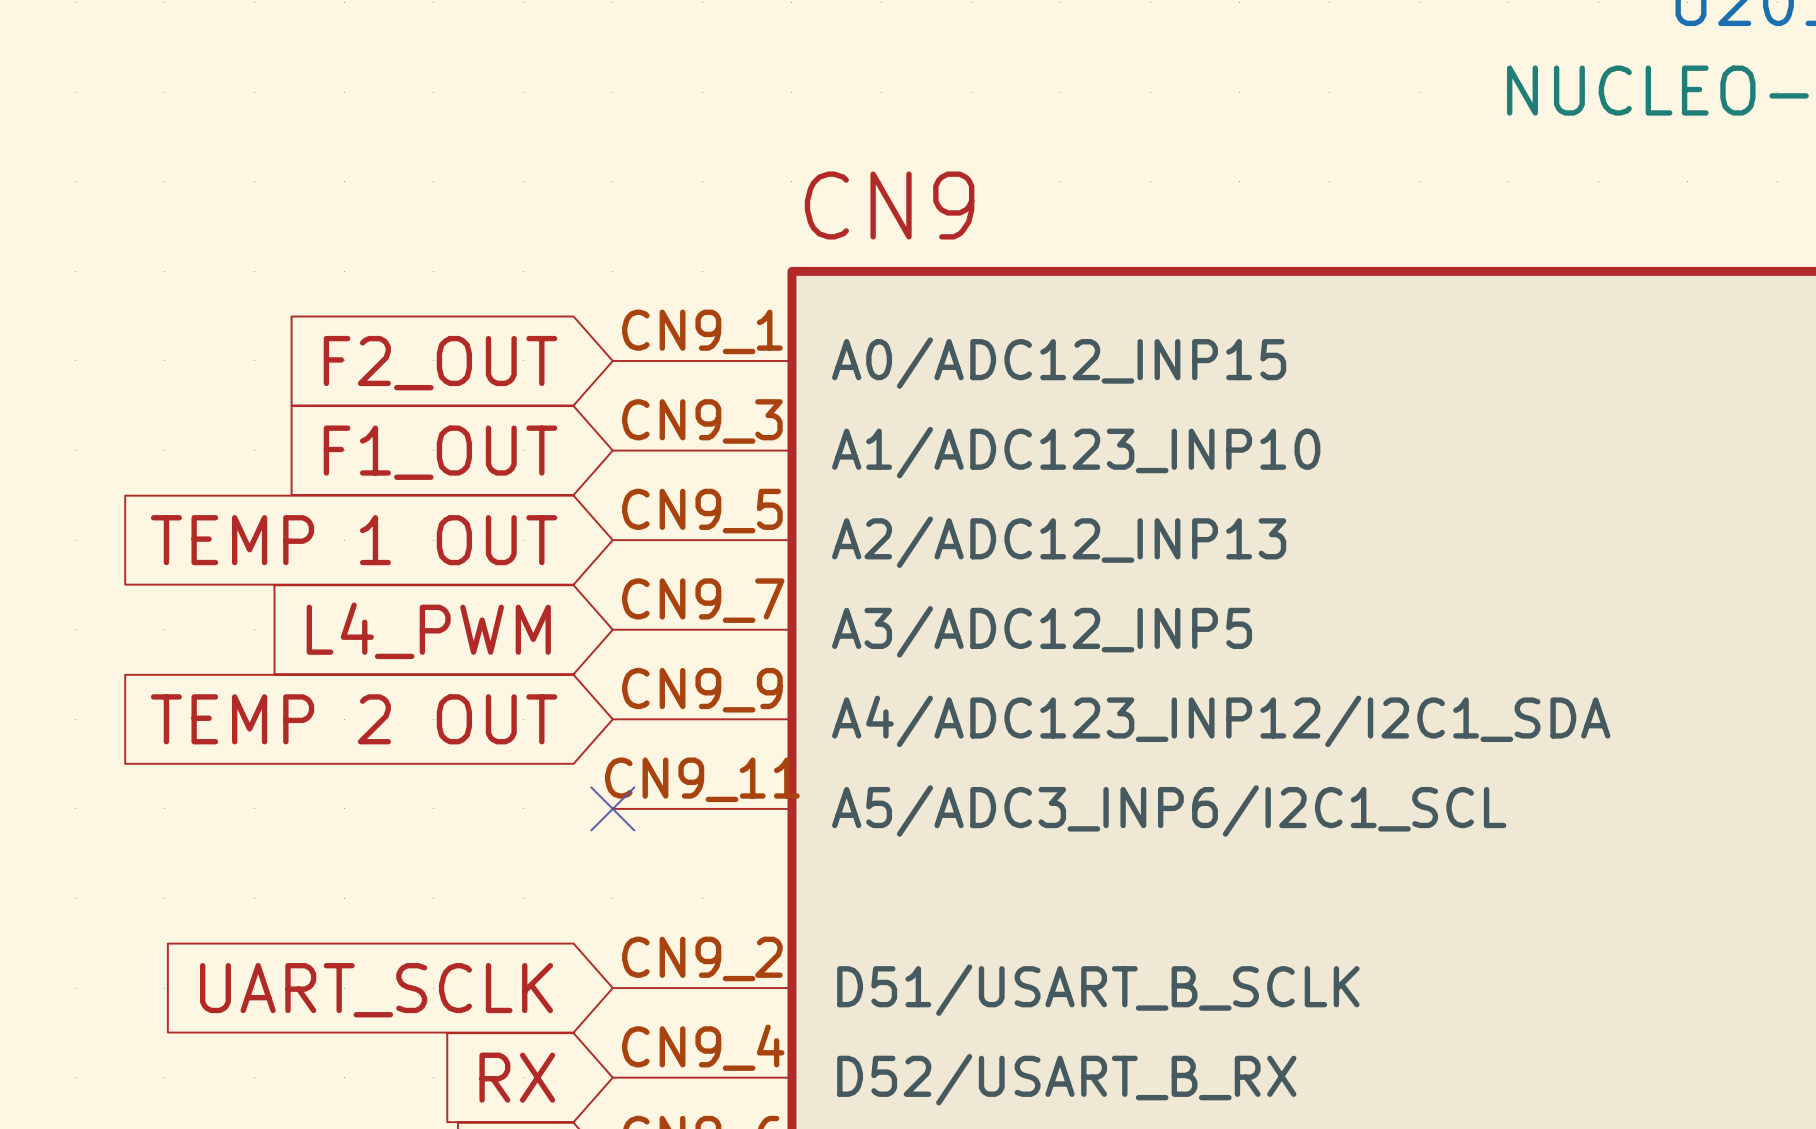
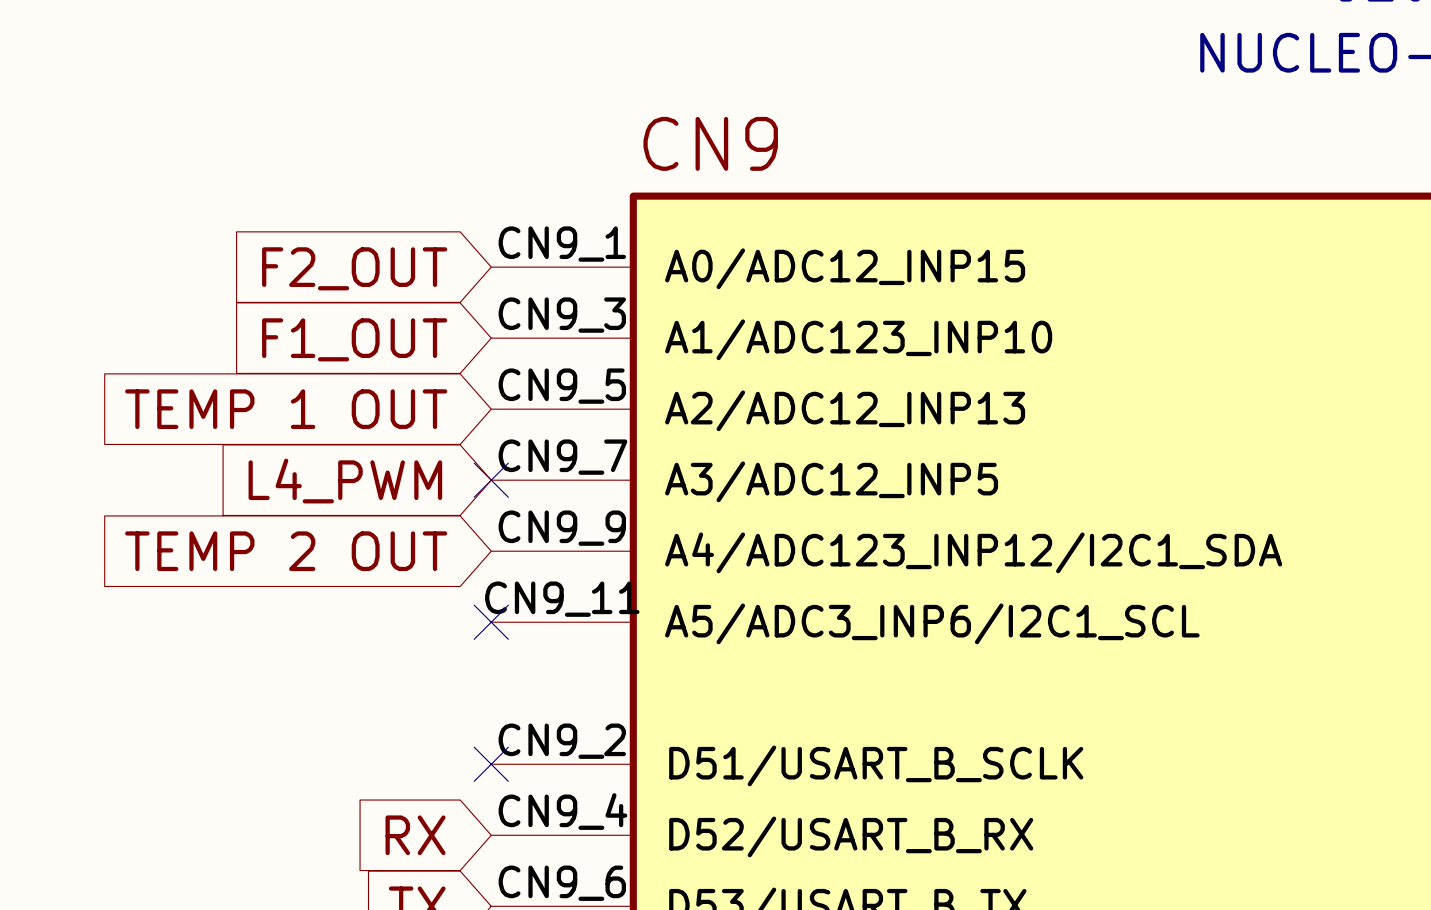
no-connect mark: none -> (491, 480)
no-connect mark: none -> (491, 764)
global label: UART_SCLK (376, 990) -> none

